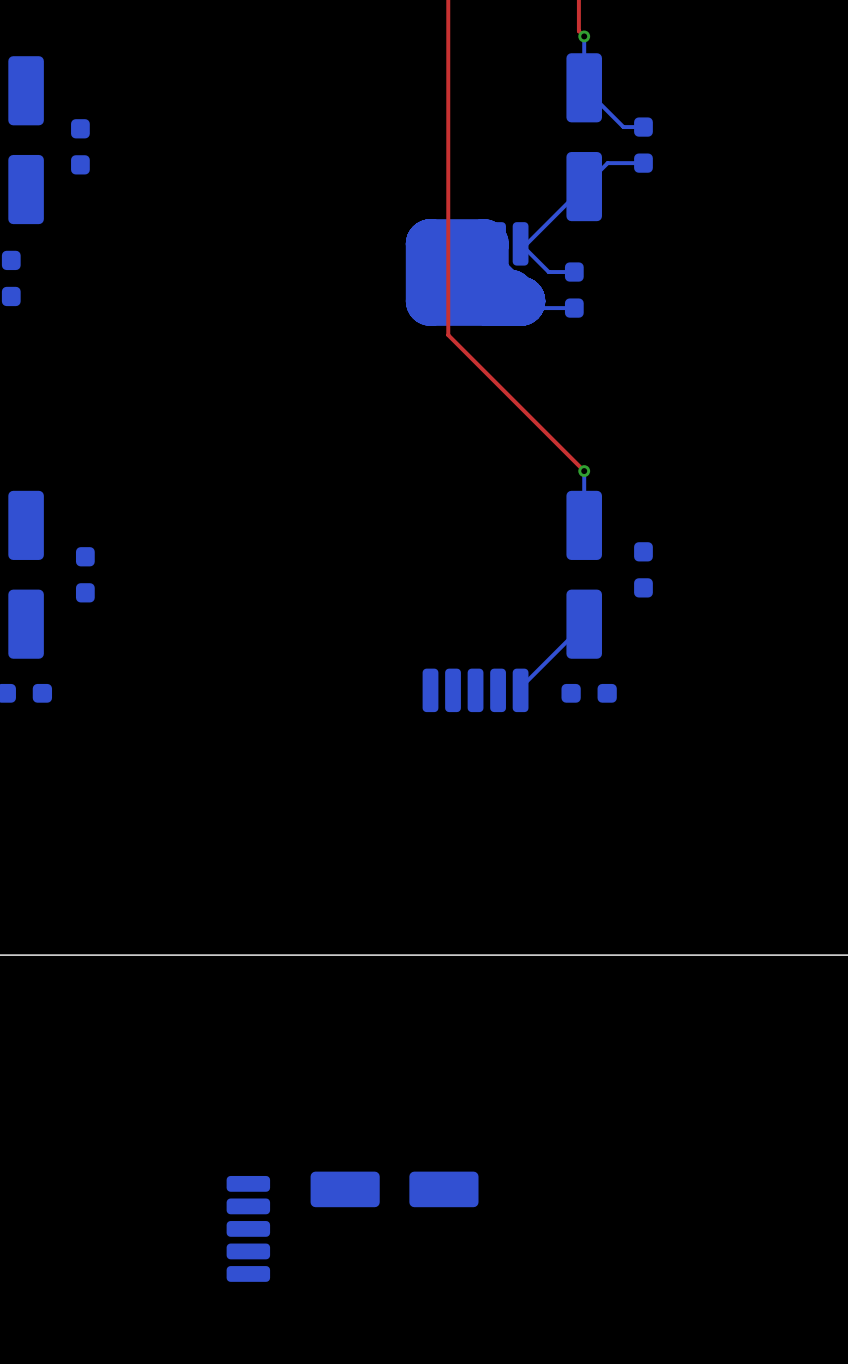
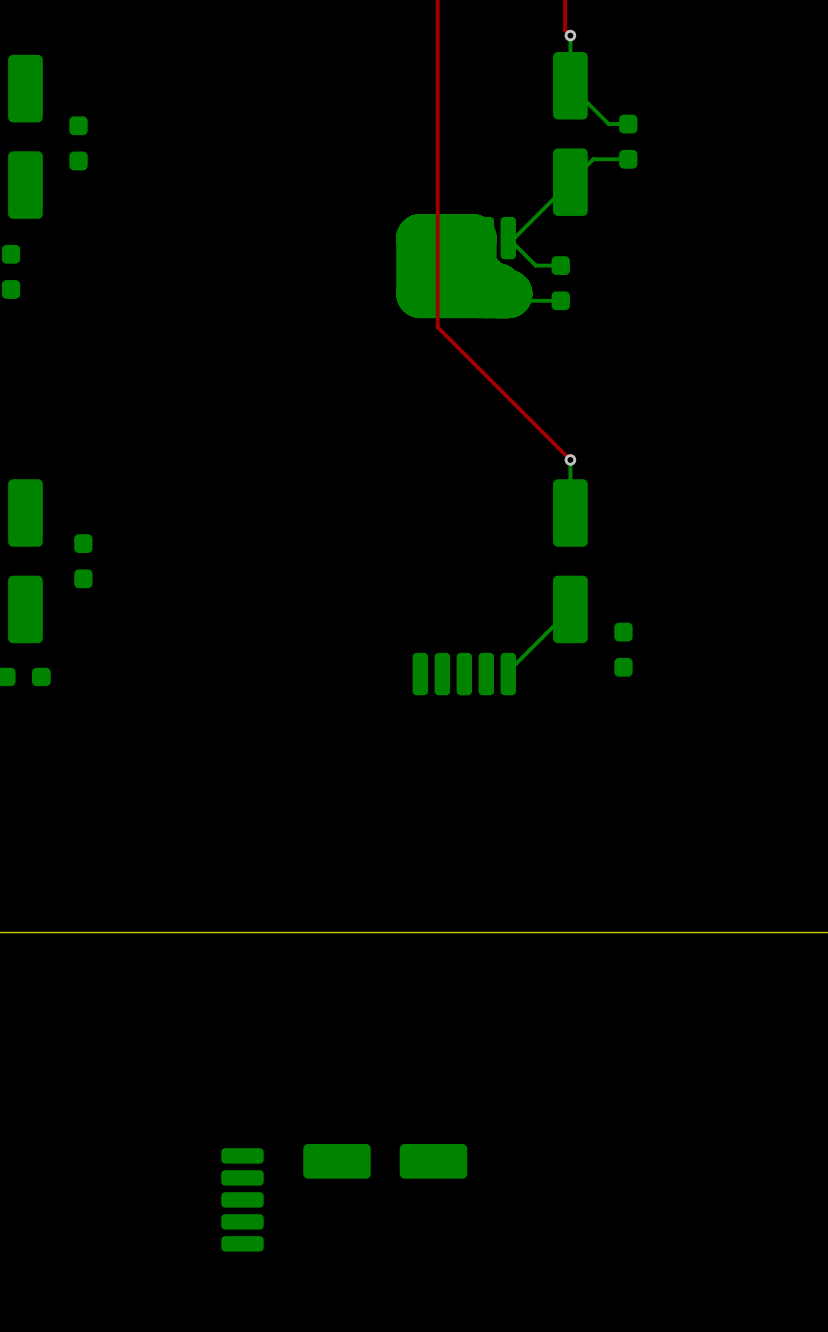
part: (643, 569) -> none
part: none -> (623, 649)
part: (589, 693) -> none

